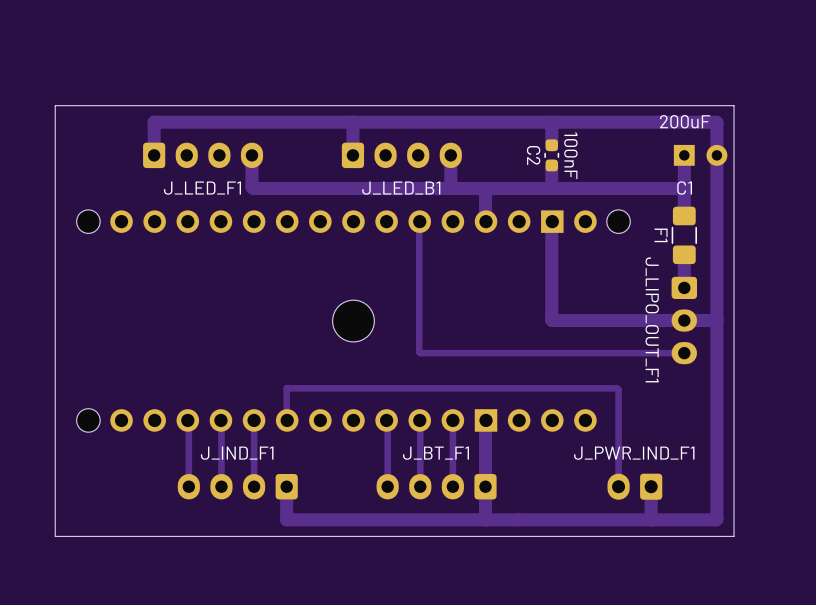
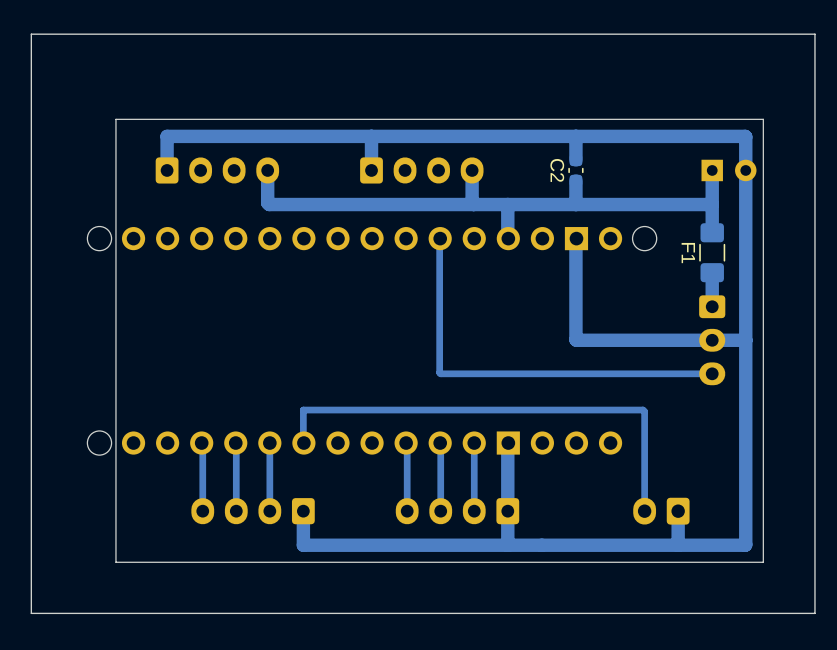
board edge: none -> (814, 34) (31, 34) (31, 613) (814, 613) (814, 34)
board edge: (104, 105) (55, 105) (55, 536) (104, 536) -> (115, 119) (115, 562)
C1 value: 200uF (685, 121) -> none
C2 value: 100nF (570, 155) -> none
J_LED_F1 name: J_LED_F1 (202, 188) -> none
J_LED_B1 name: J_LED_B1 (401, 188) -> none
C1 name: C1 (684, 188) -> none
J_LIPO_OUT_F1 name: J_LIPO_OUT_F1 (652, 319) -> none
part: (353, 321) -> none
J_IND_F1 name: J_IND_F1 (237, 453) -> none
J_BT_F1 name: J_BT_F1 (435, 453) -> none
J_PWR_IND_F1 name: J_PWR_IND_F1 (634, 453) -> none

